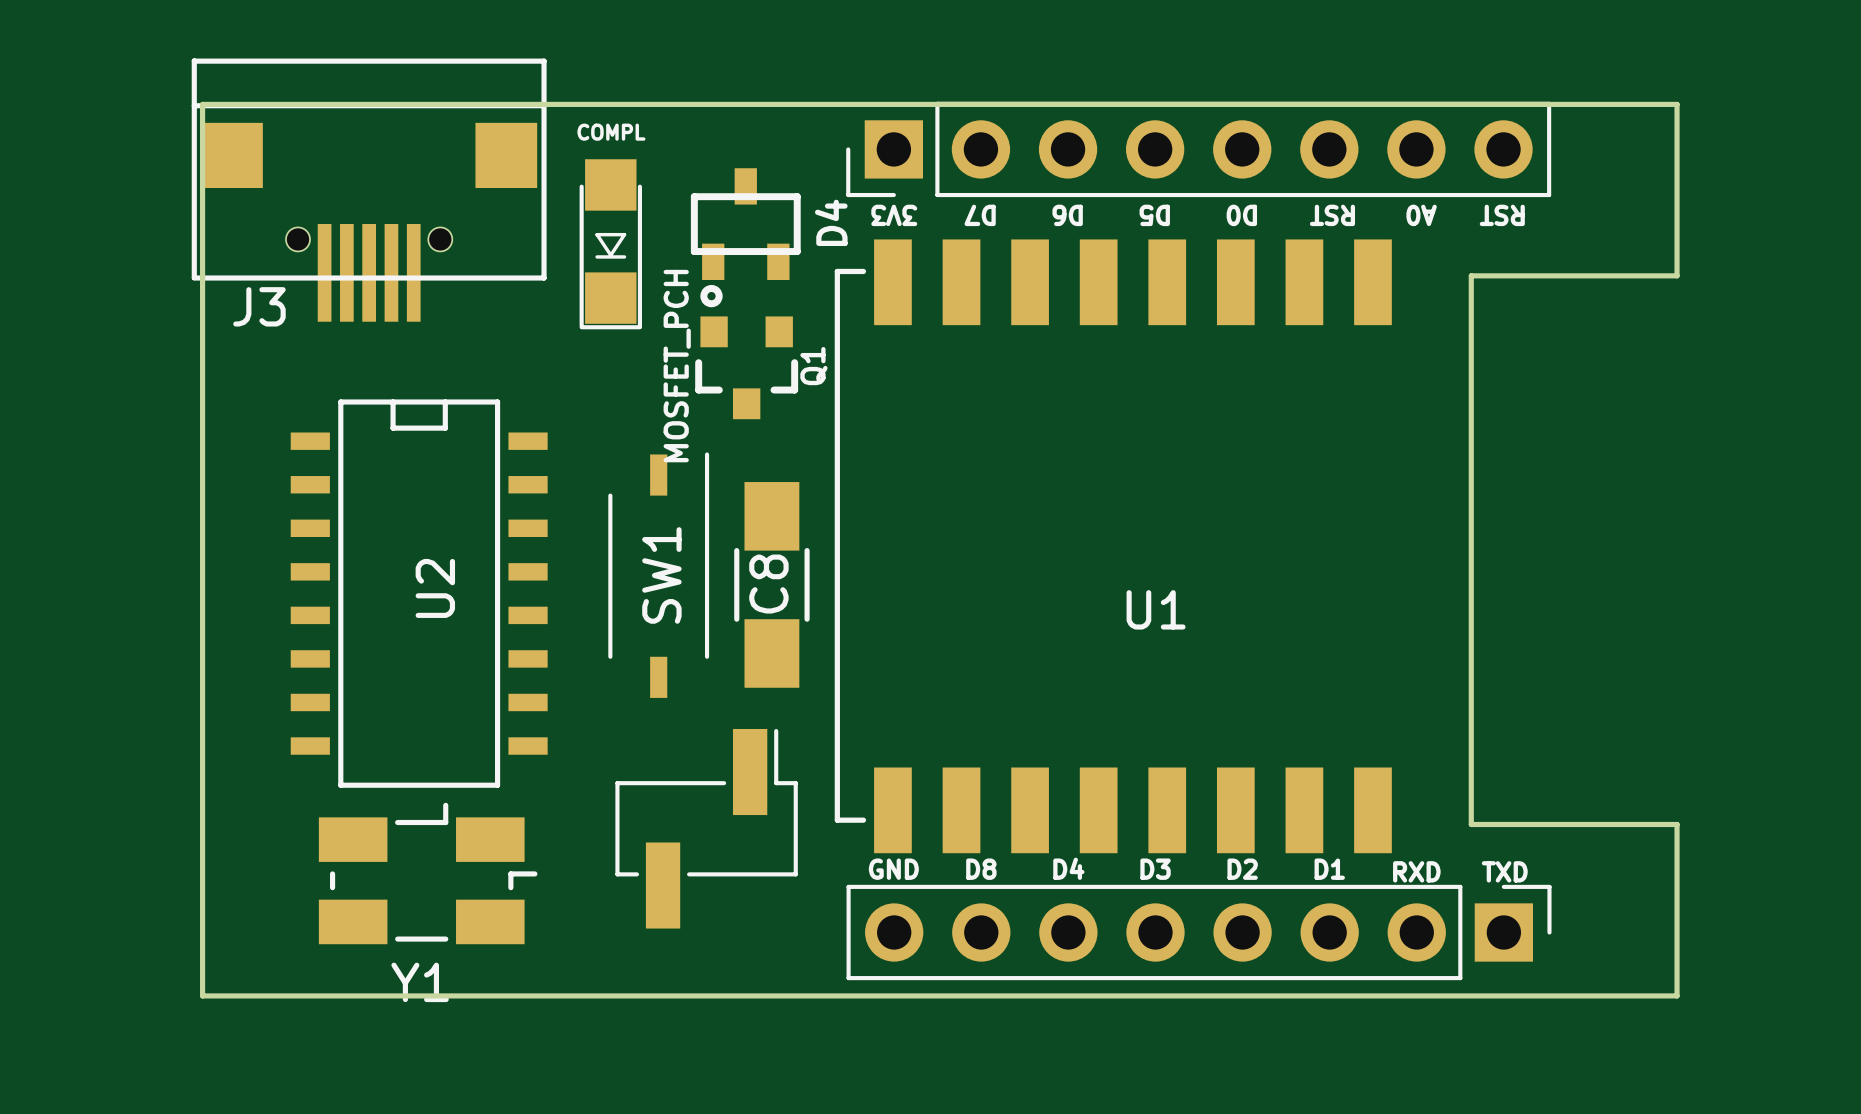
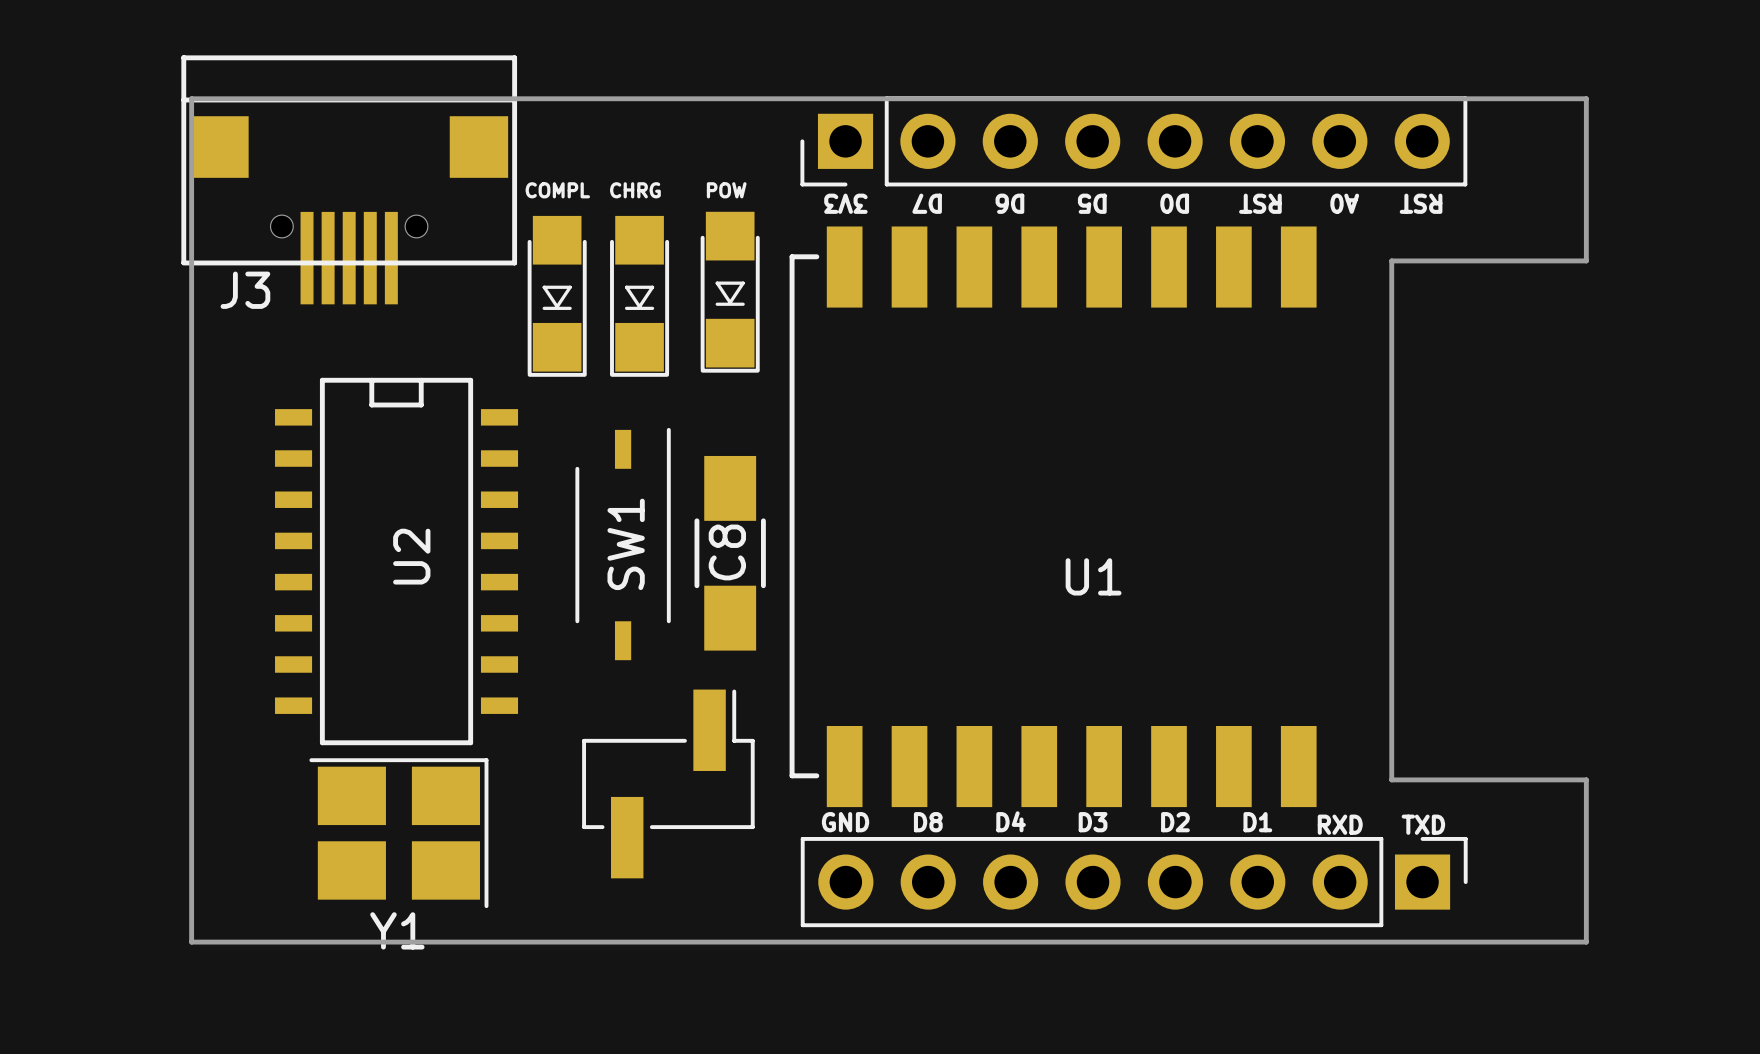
text position: COMPL (611, 132) -> COMPL (557, 190)
text: none -> CHRG (635, 190)
text: none -> POW (726, 190)
D4: (745, 237) -> none
part: (610, 244) -> none
part: none -> (730, 292)
part: none -> (557, 296)
part: none -> (639, 296)
Q1: MOSFET_PCH (746, 367) -> none
Y1 footprint: [318, 802, 538, 945] -> [309, 758, 489, 909]

